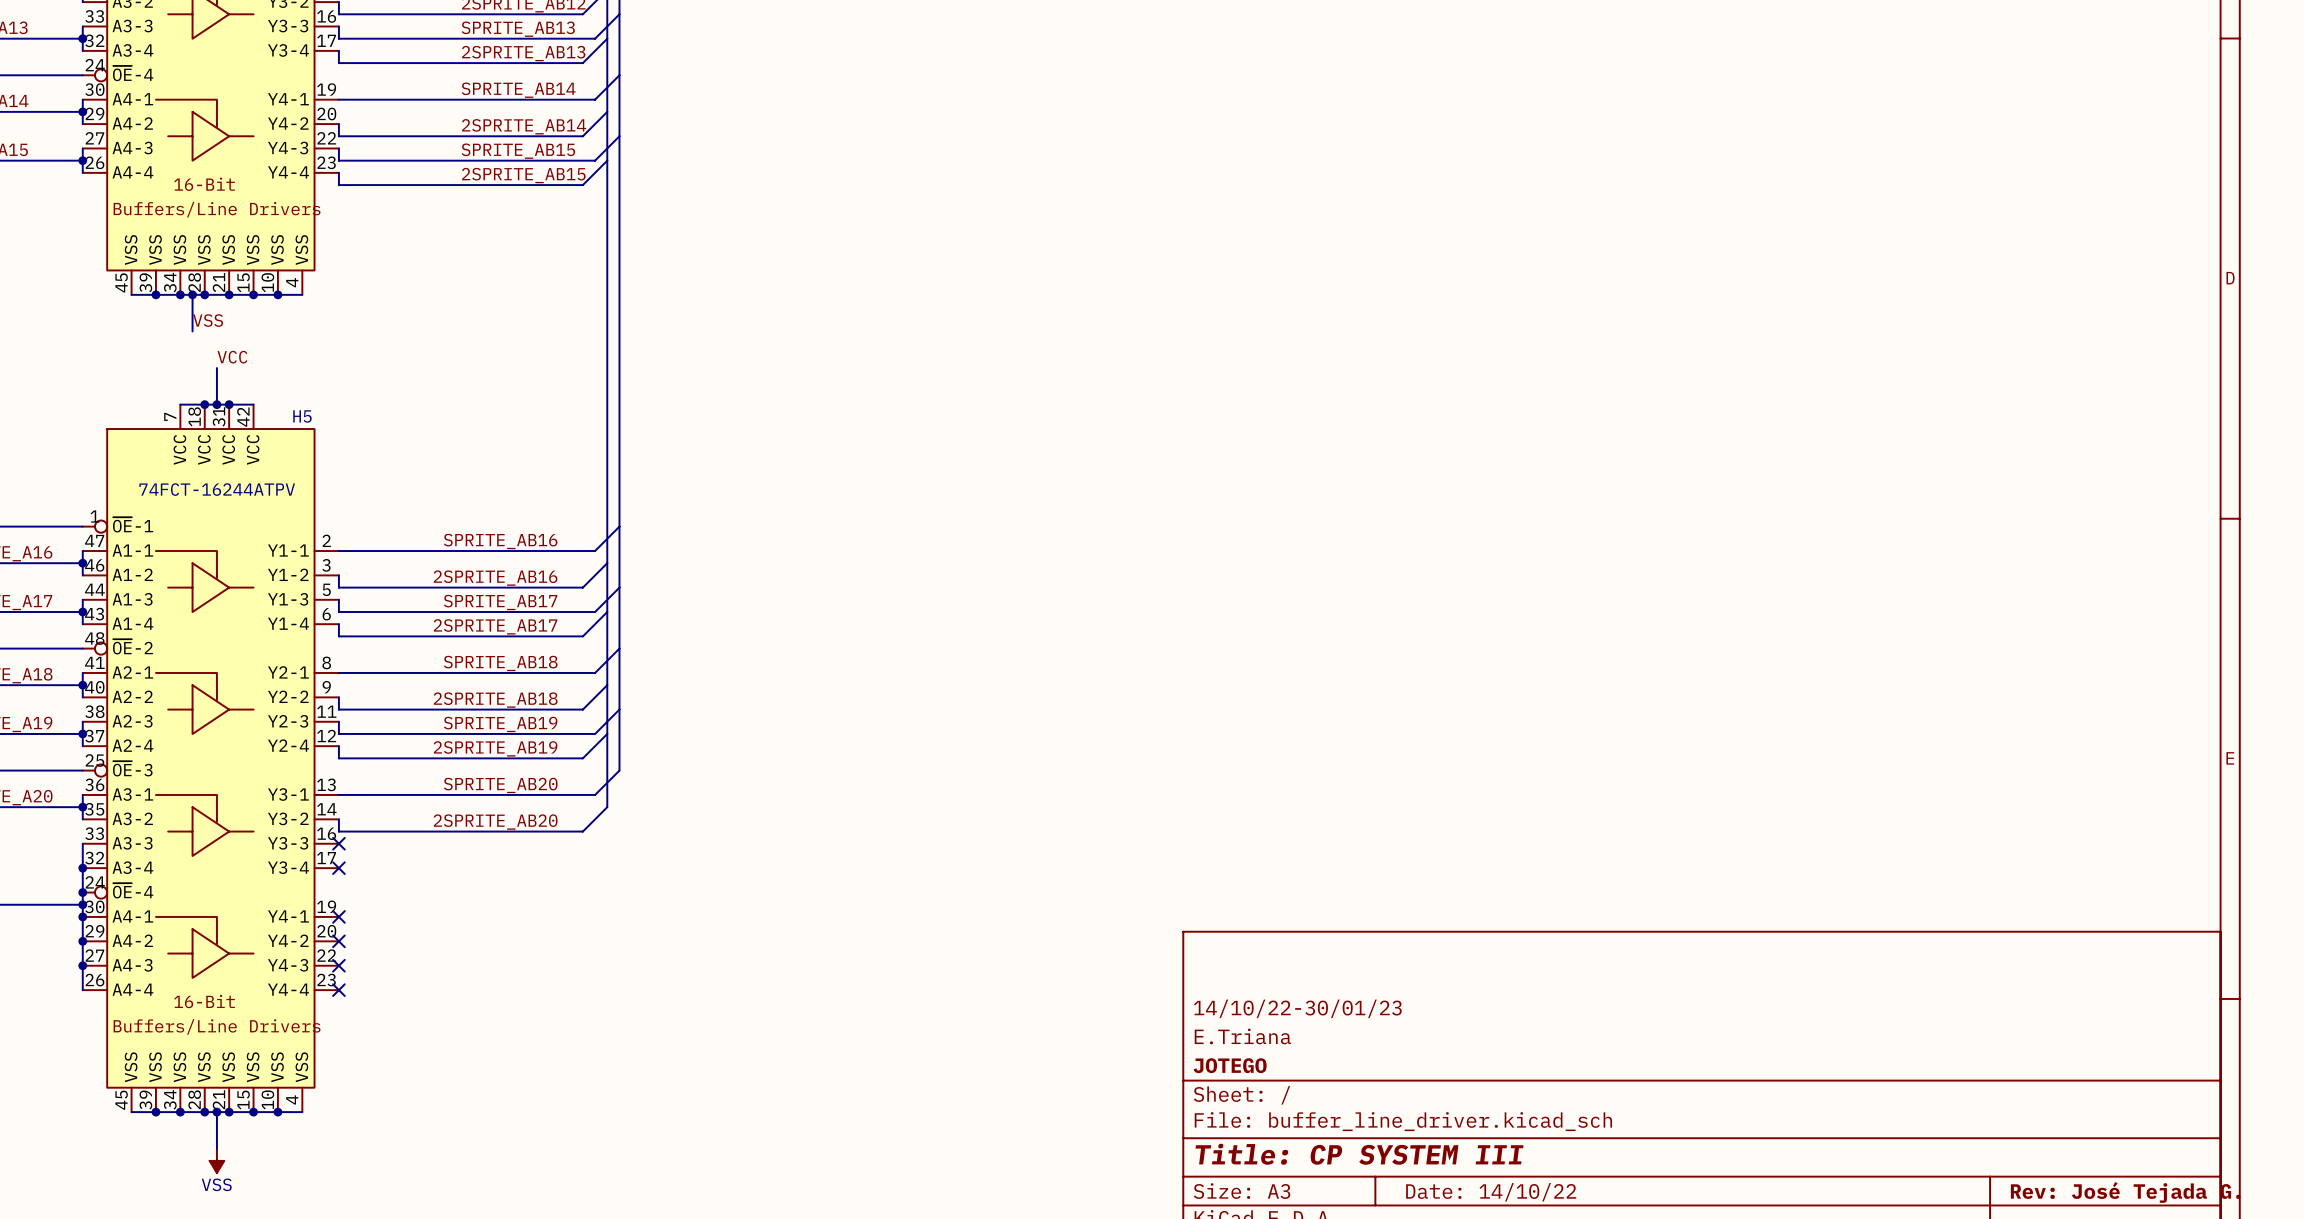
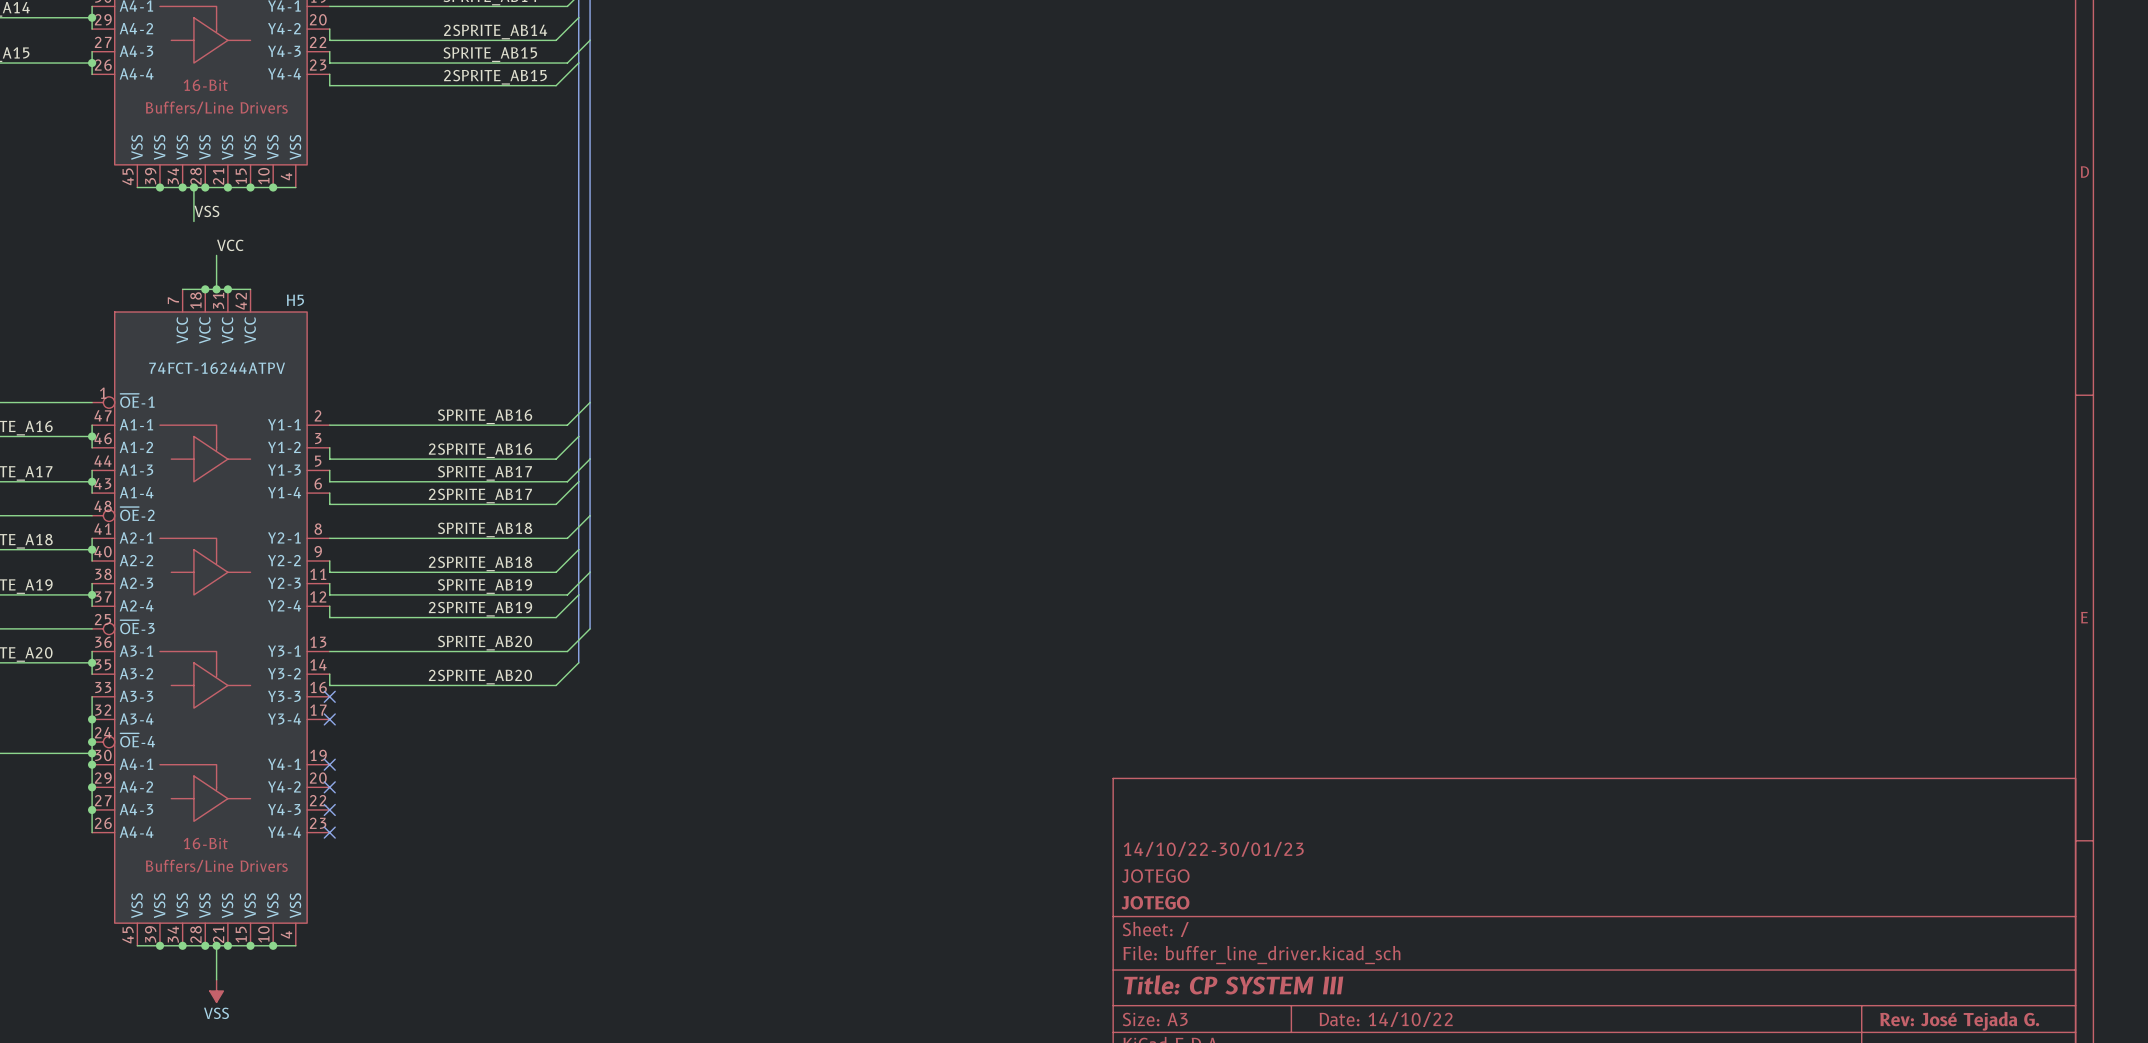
title block: E.Triana (1242, 1036) -> JOTEGO (1155, 876)

